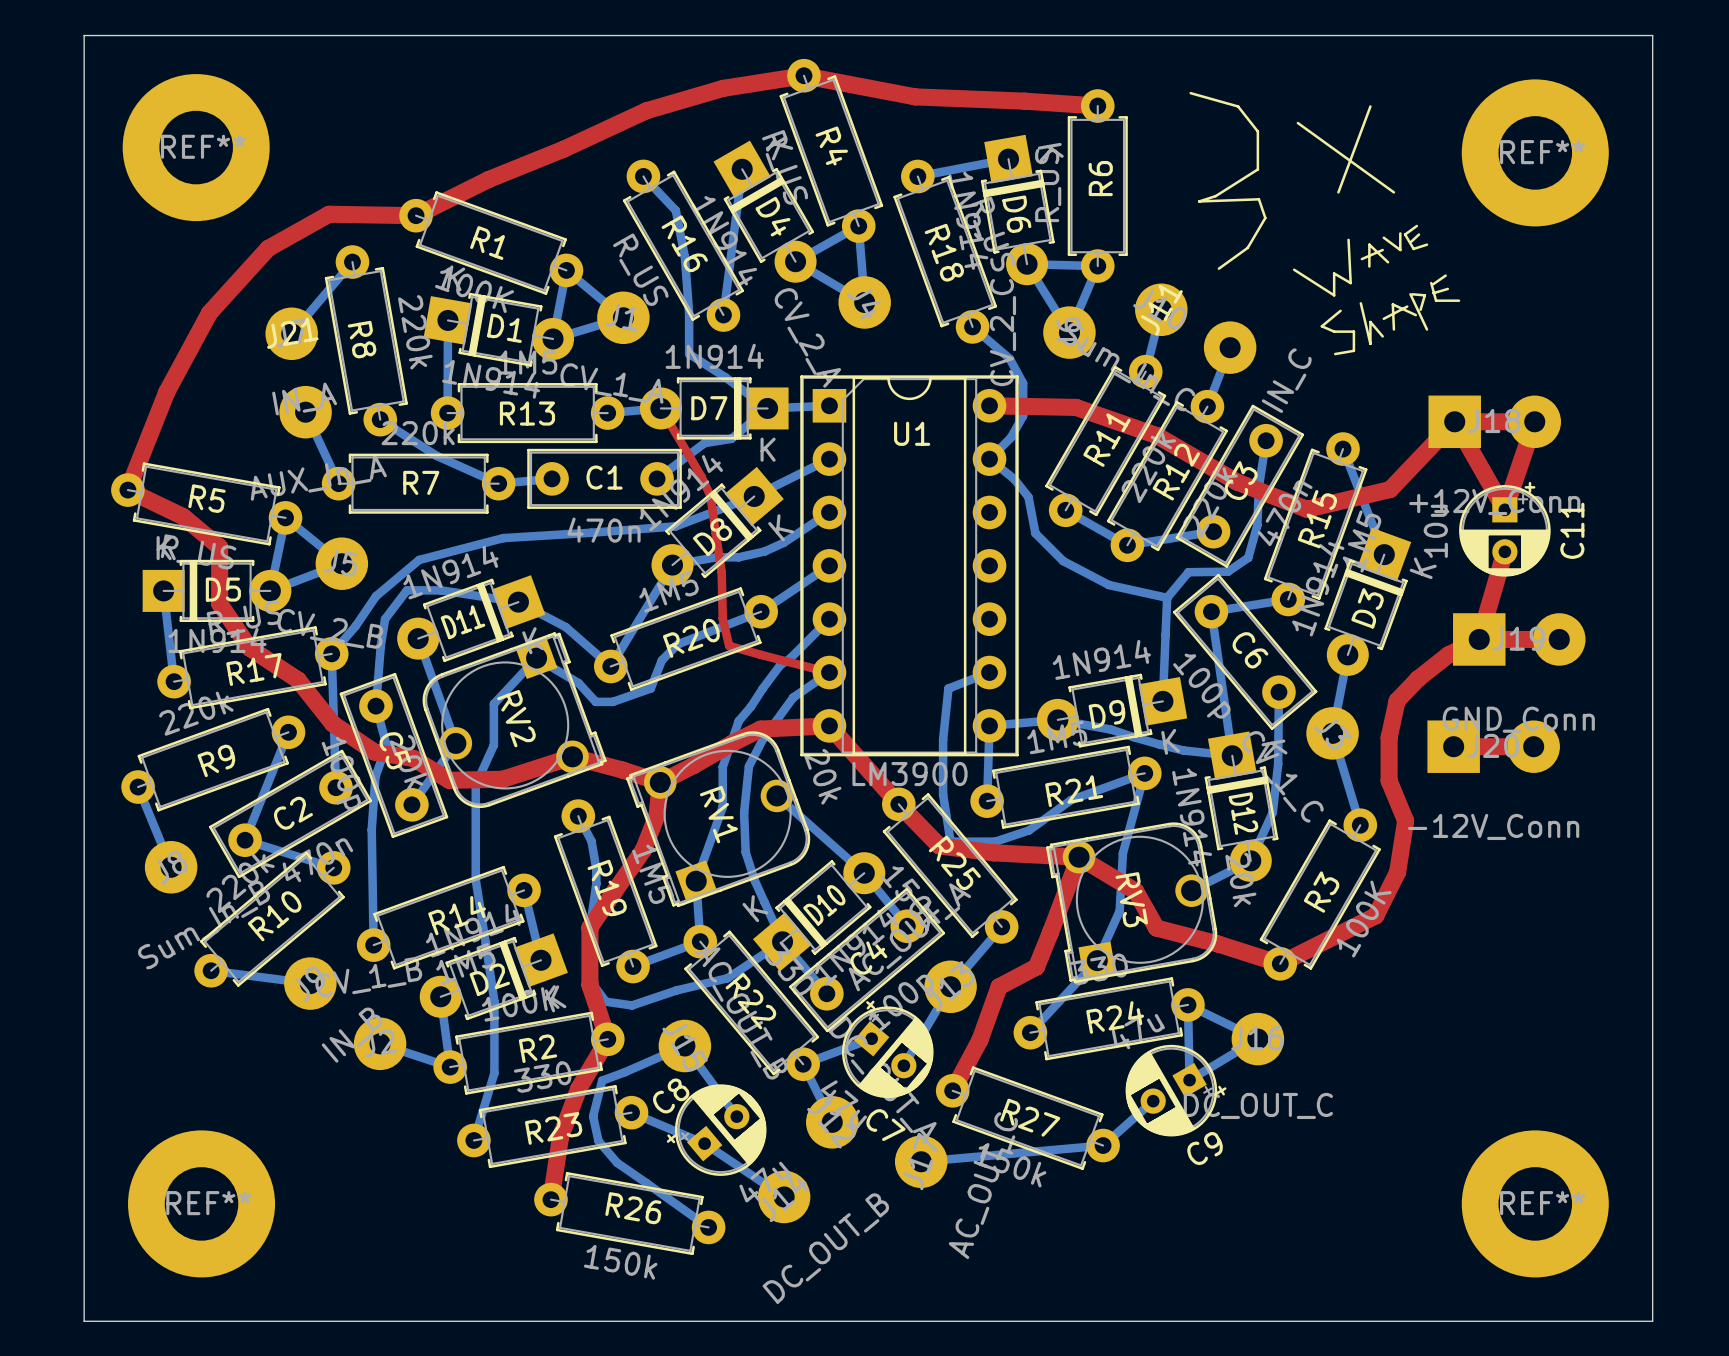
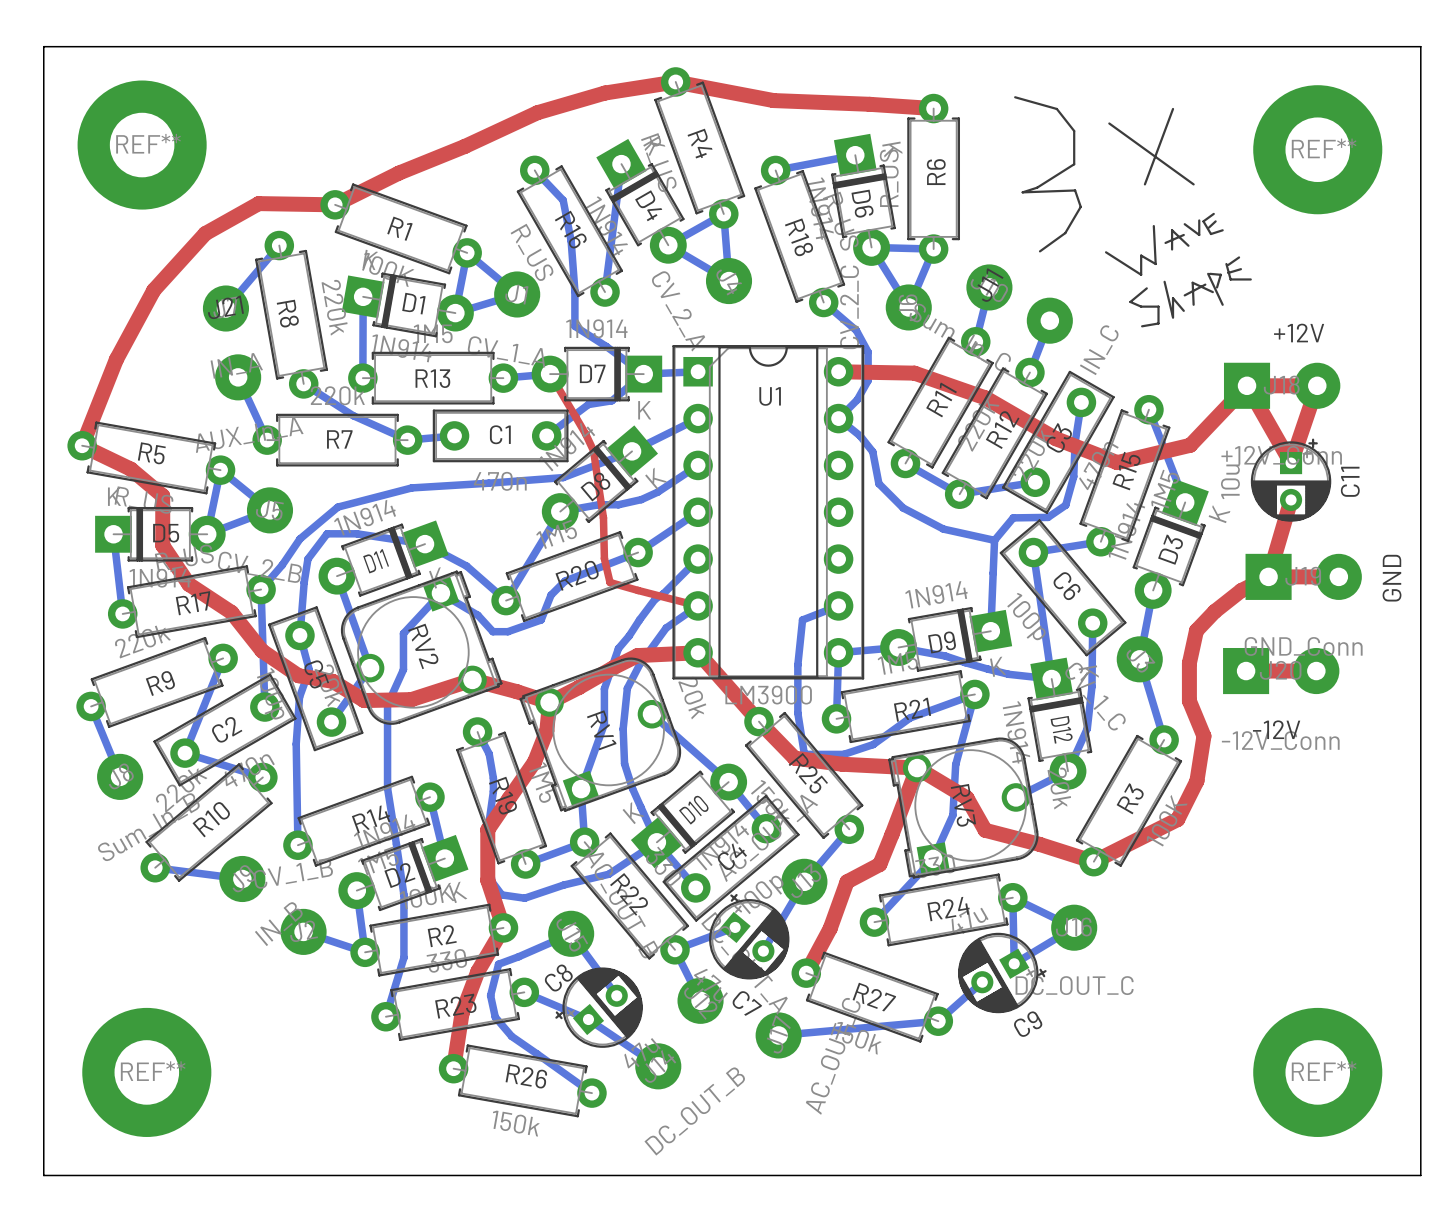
text: none -> +12V (1299, 333)
text: none -> GND (1392, 578)
text: none -> -12V (1276, 729)

